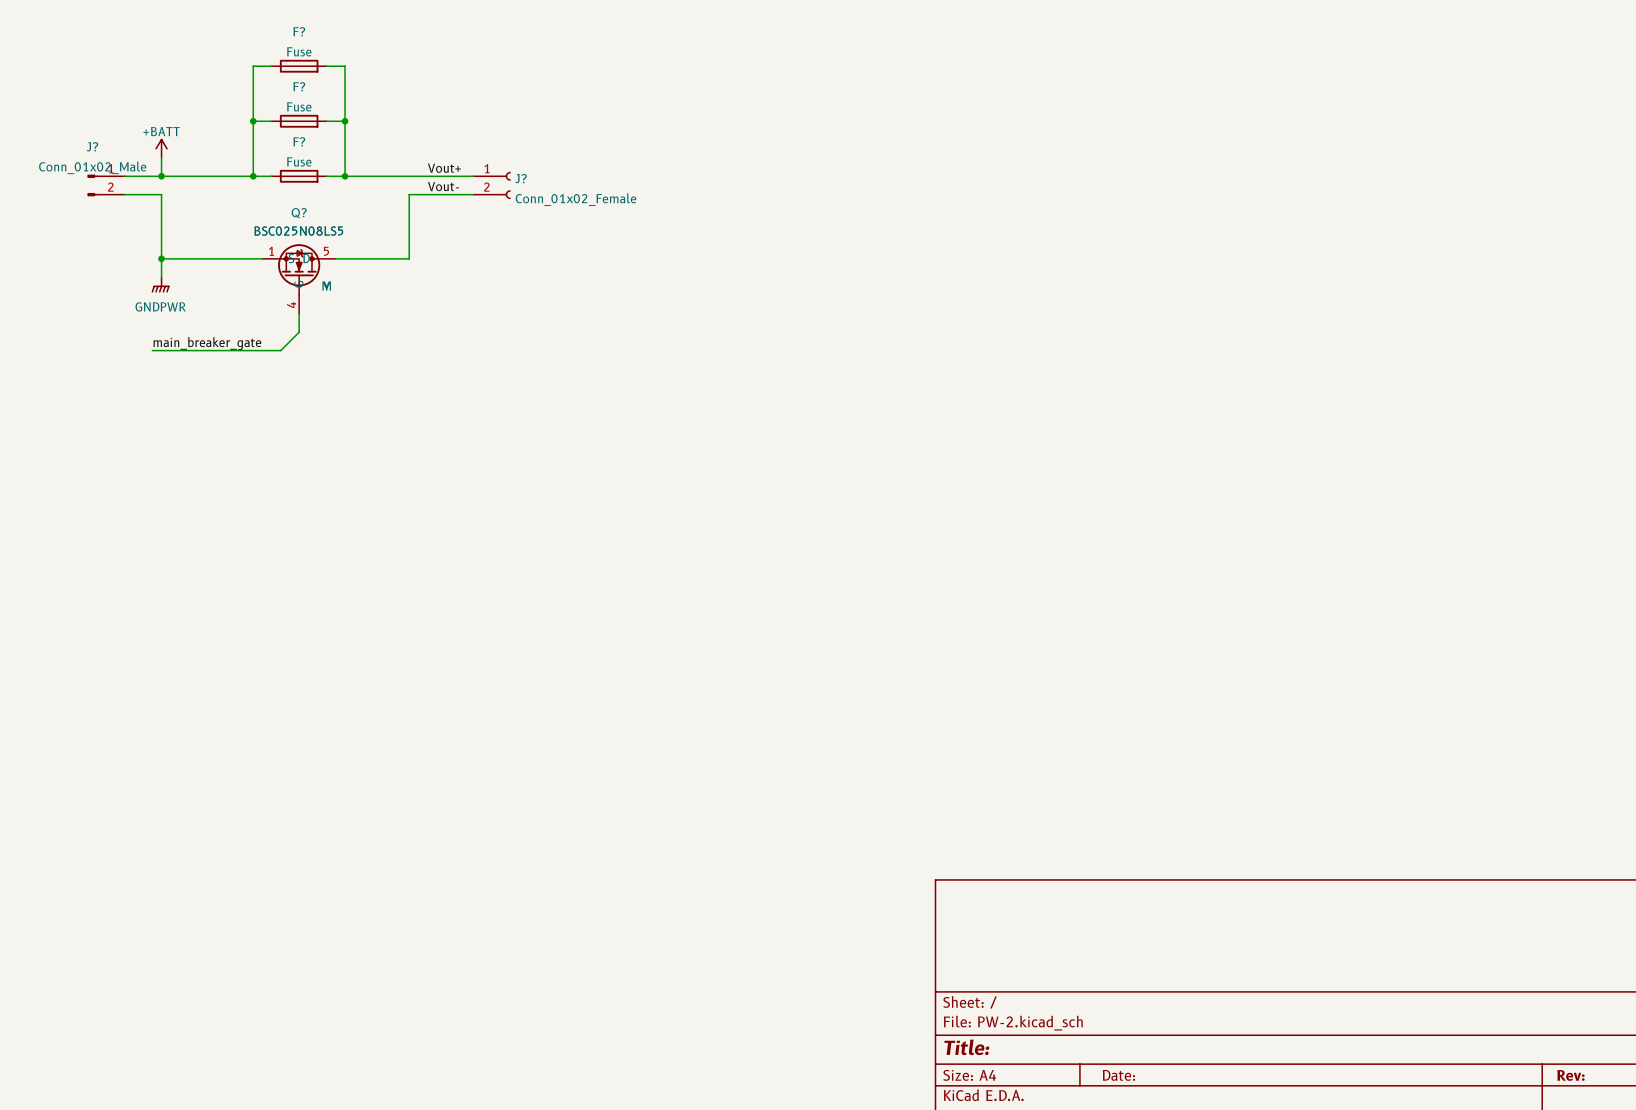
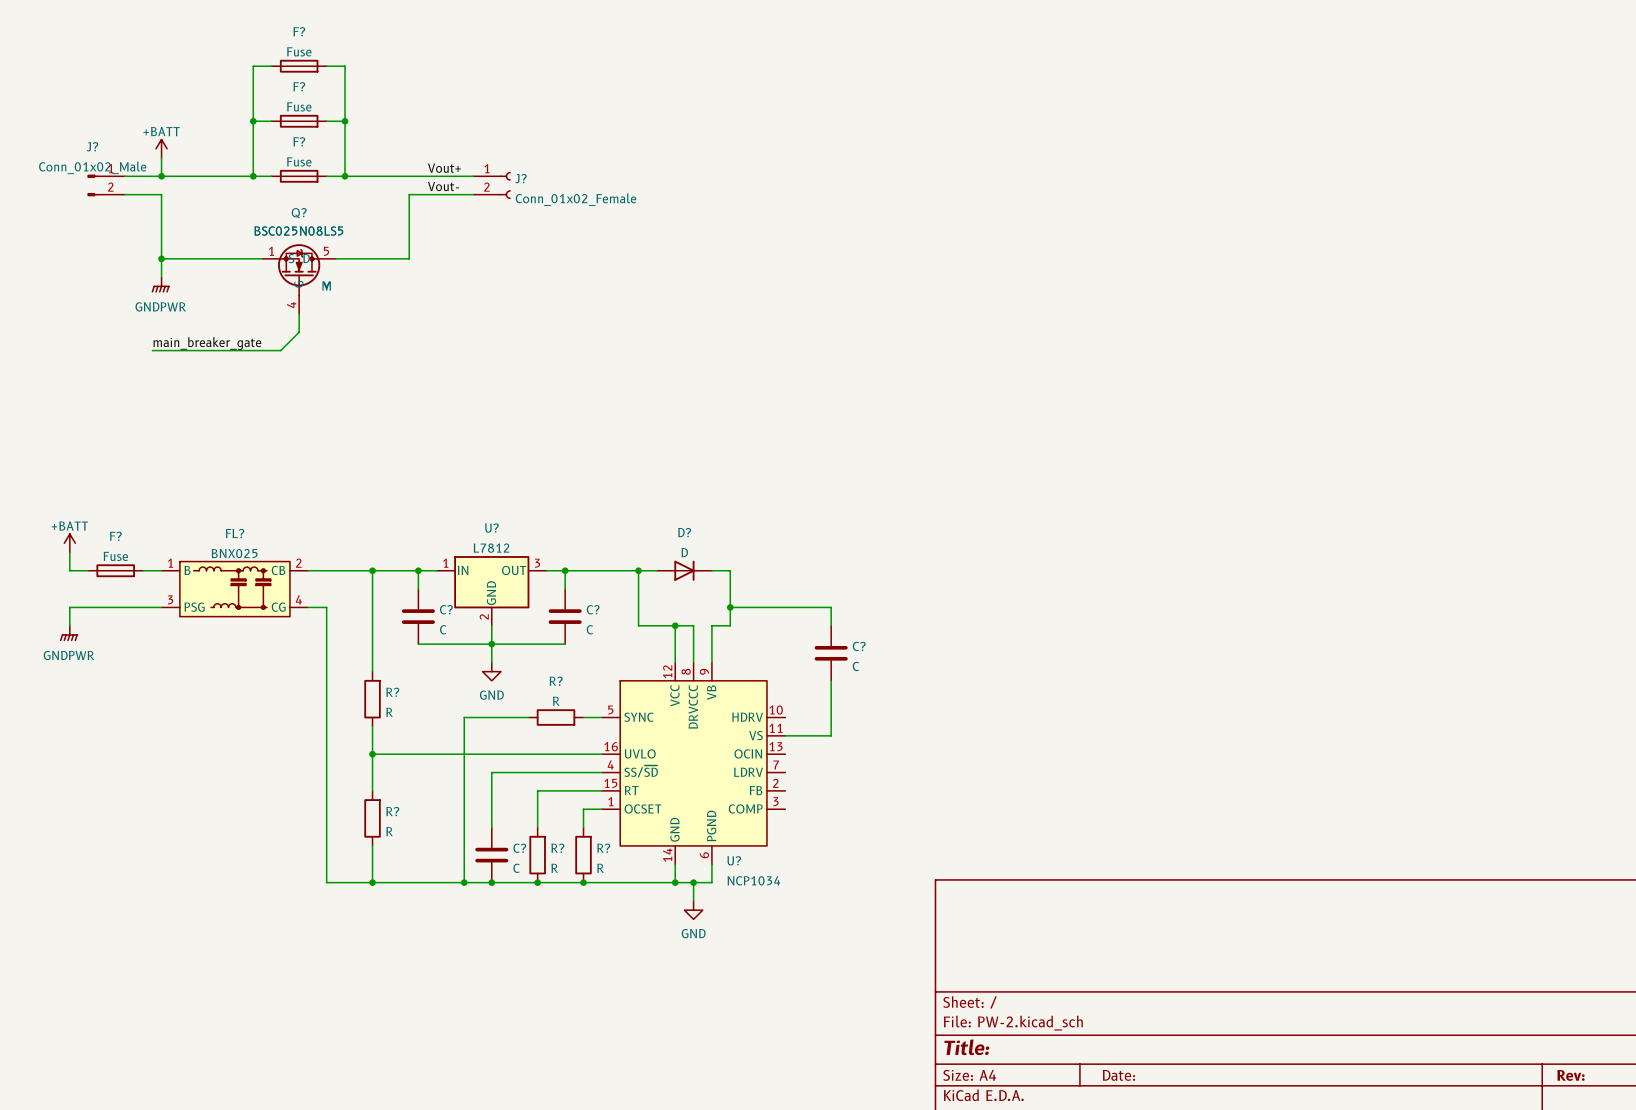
power symbol: none -> +BATT (69, 543)
wire: none -> (69, 552) (69, 570) (88, 570)
F?: none -> Fuse (115, 570)
wire: none -> (143, 570) (161, 570)
wire: none -> (308, 570) (436, 570)
wire: none -> (372, 570) (372, 671)
junction: none -> (372, 570)
wire: none -> (418, 570) (418, 589)
junction: none -> (418, 570)
wire: none -> (546, 570) (656, 570)
wire: none -> (565, 570) (565, 589)
junction: none -> (565, 570)
wire: none -> (638, 570) (638, 625) (693, 625) (693, 662)
junction: none -> (638, 570)
D?: none -> D (684, 570)
wire: none -> (711, 570) (730, 570) (730, 625) (711, 625) (711, 662)
FL?: none -> BNX025 (234, 589)
U?: none -> L7812 (491, 590)
wire: none -> (161, 607) (69, 607) (69, 625)
wire: none -> (308, 607) (326, 607) (326, 882) (711, 882) (711, 864)
wire: none -> (730, 607) (831, 607) (831, 625)
junction: none -> (730, 607)
C?: none -> C (418, 616)
C?: none -> C (565, 616)
wire: none -> (491, 625) (491, 662)
wire: none -> (675, 625) (675, 662)
junction: none -> (675, 625)
power symbol: none -> GNDPWR (68, 633)
wire: none -> (418, 644) (565, 644)
junction: none -> (491, 644)
C?: none -> C (831, 653)
power symbol: none -> GND (491, 671)
wire: none -> (831, 680) (831, 735) (785, 735)
R?: none -> R (372, 699)
wire: none -> (528, 717) (464, 717) (464, 882)
R?: none -> R (555, 717)
wire: none -> (583, 717) (601, 717)
wire: none -> (372, 726) (372, 790)
wire: none -> (372, 754) (601, 754)
junction: none -> (372, 754)
U?: none -> NCP1034 (693, 763)
wire: none -> (601, 772) (491, 772) (491, 827)
wire: none -> (601, 790) (537, 790) (537, 827)
wire: none -> (601, 809) (583, 809) (583, 827)
R?: none -> R (372, 818)
wire: none -> (372, 845) (372, 882)
C?: none -> C (491, 855)
R?: none -> R (537, 855)
R?: none -> R (583, 855)
wire: none -> (675, 864) (675, 882)
junction: none -> (372, 882)
junction: none -> (464, 882)
junction: none -> (491, 882)
junction: none -> (537, 882)
junction: none -> (583, 882)
junction: none -> (675, 882)
wire: none -> (693, 882) (693, 900)
junction: none -> (693, 882)
power symbol: none -> GND (693, 910)

